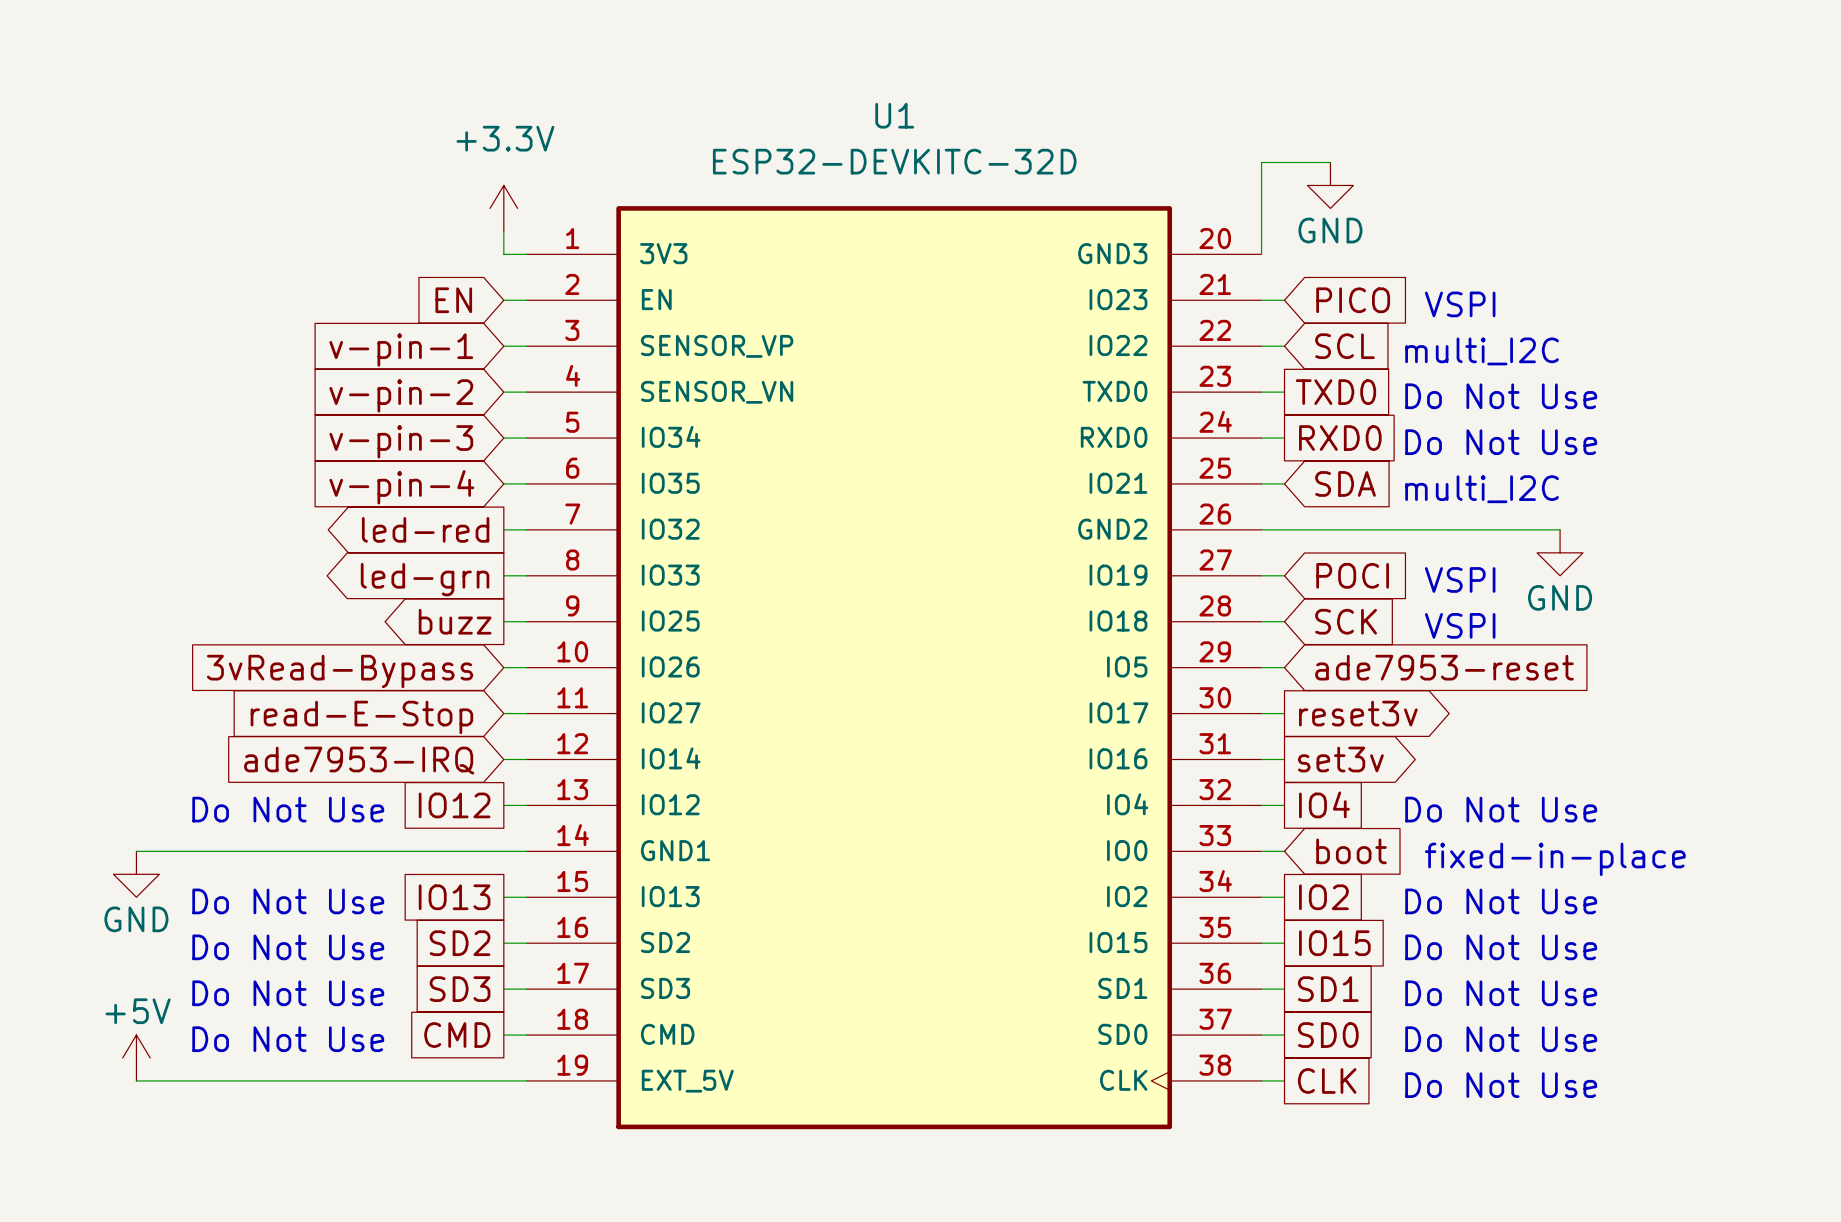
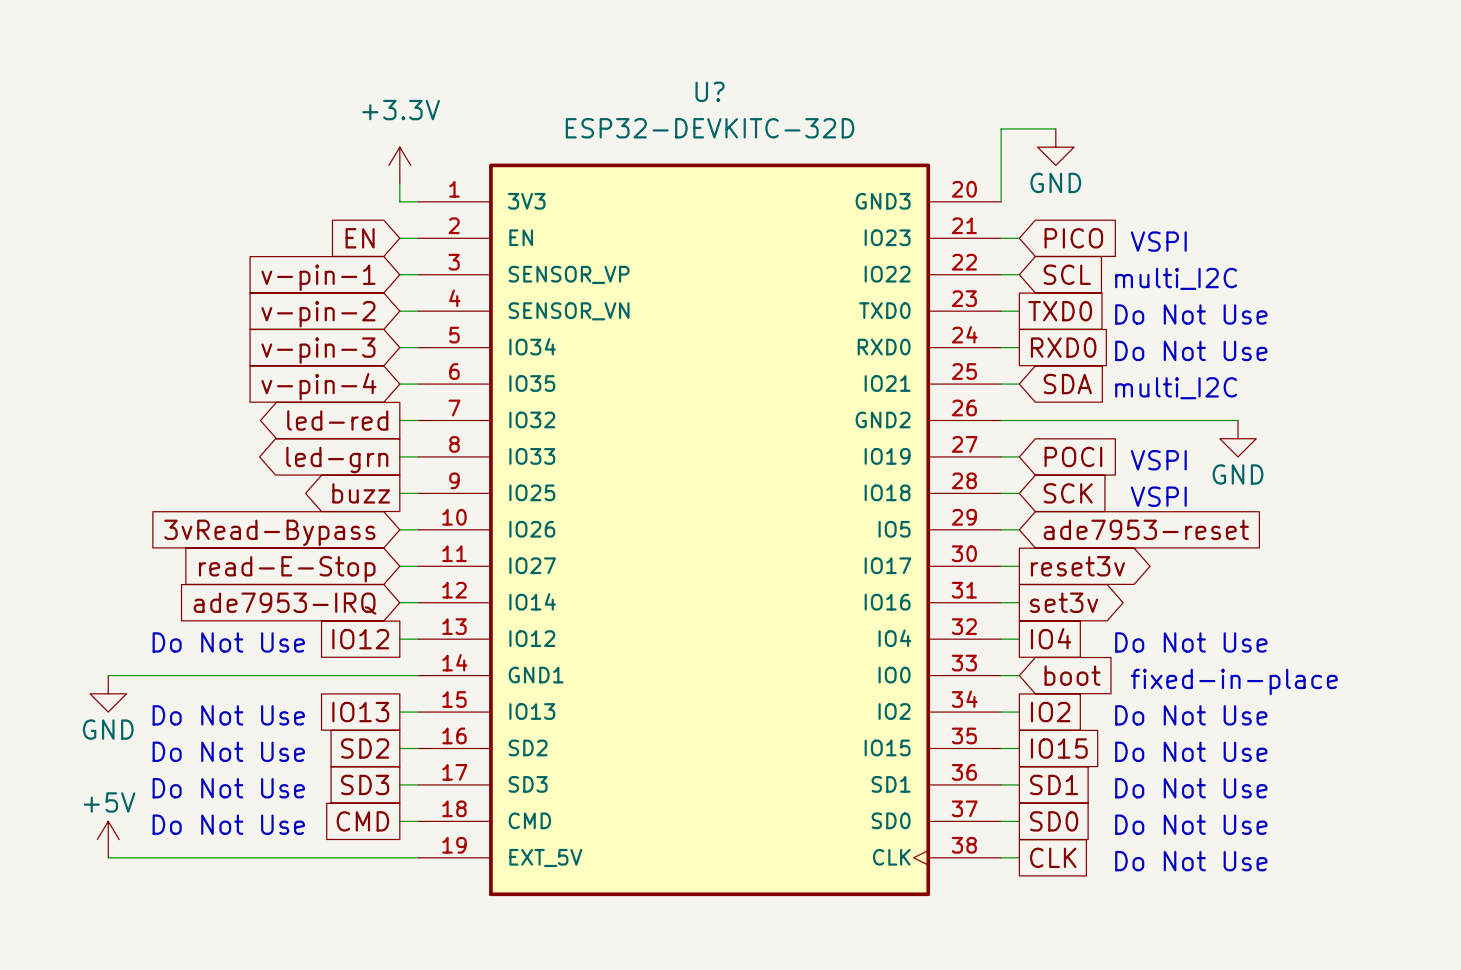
U1 name: U1 (894, 115) -> U? (710, 91)

